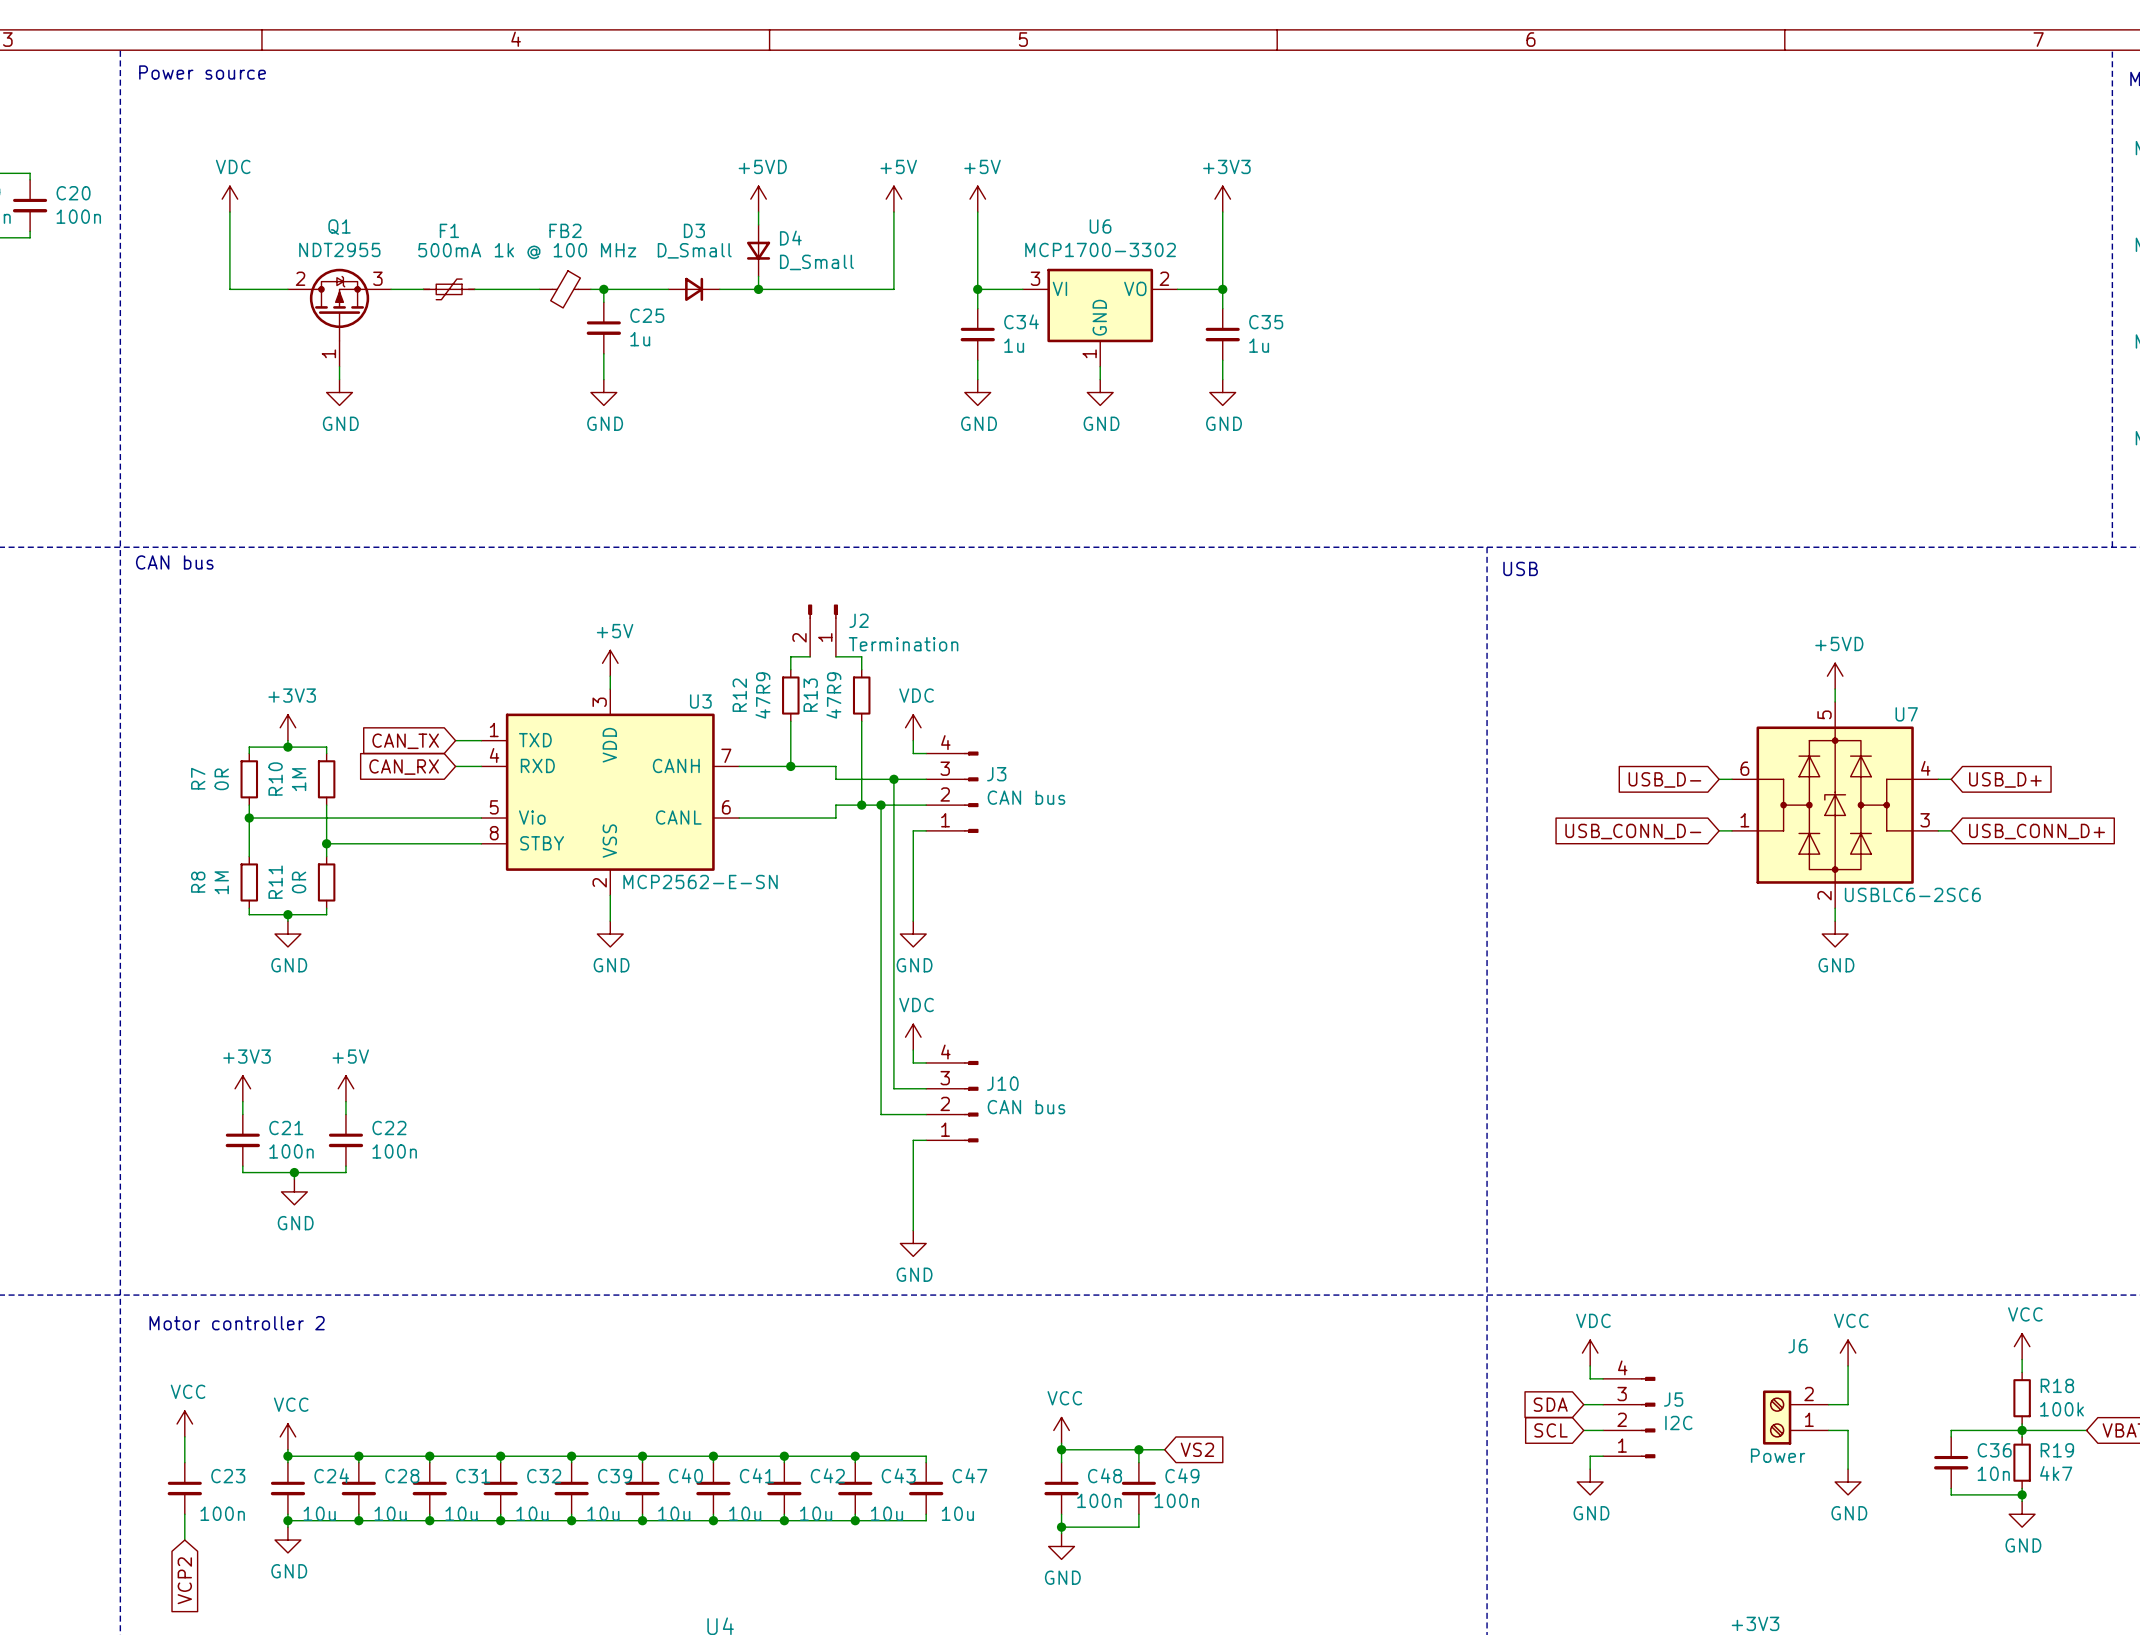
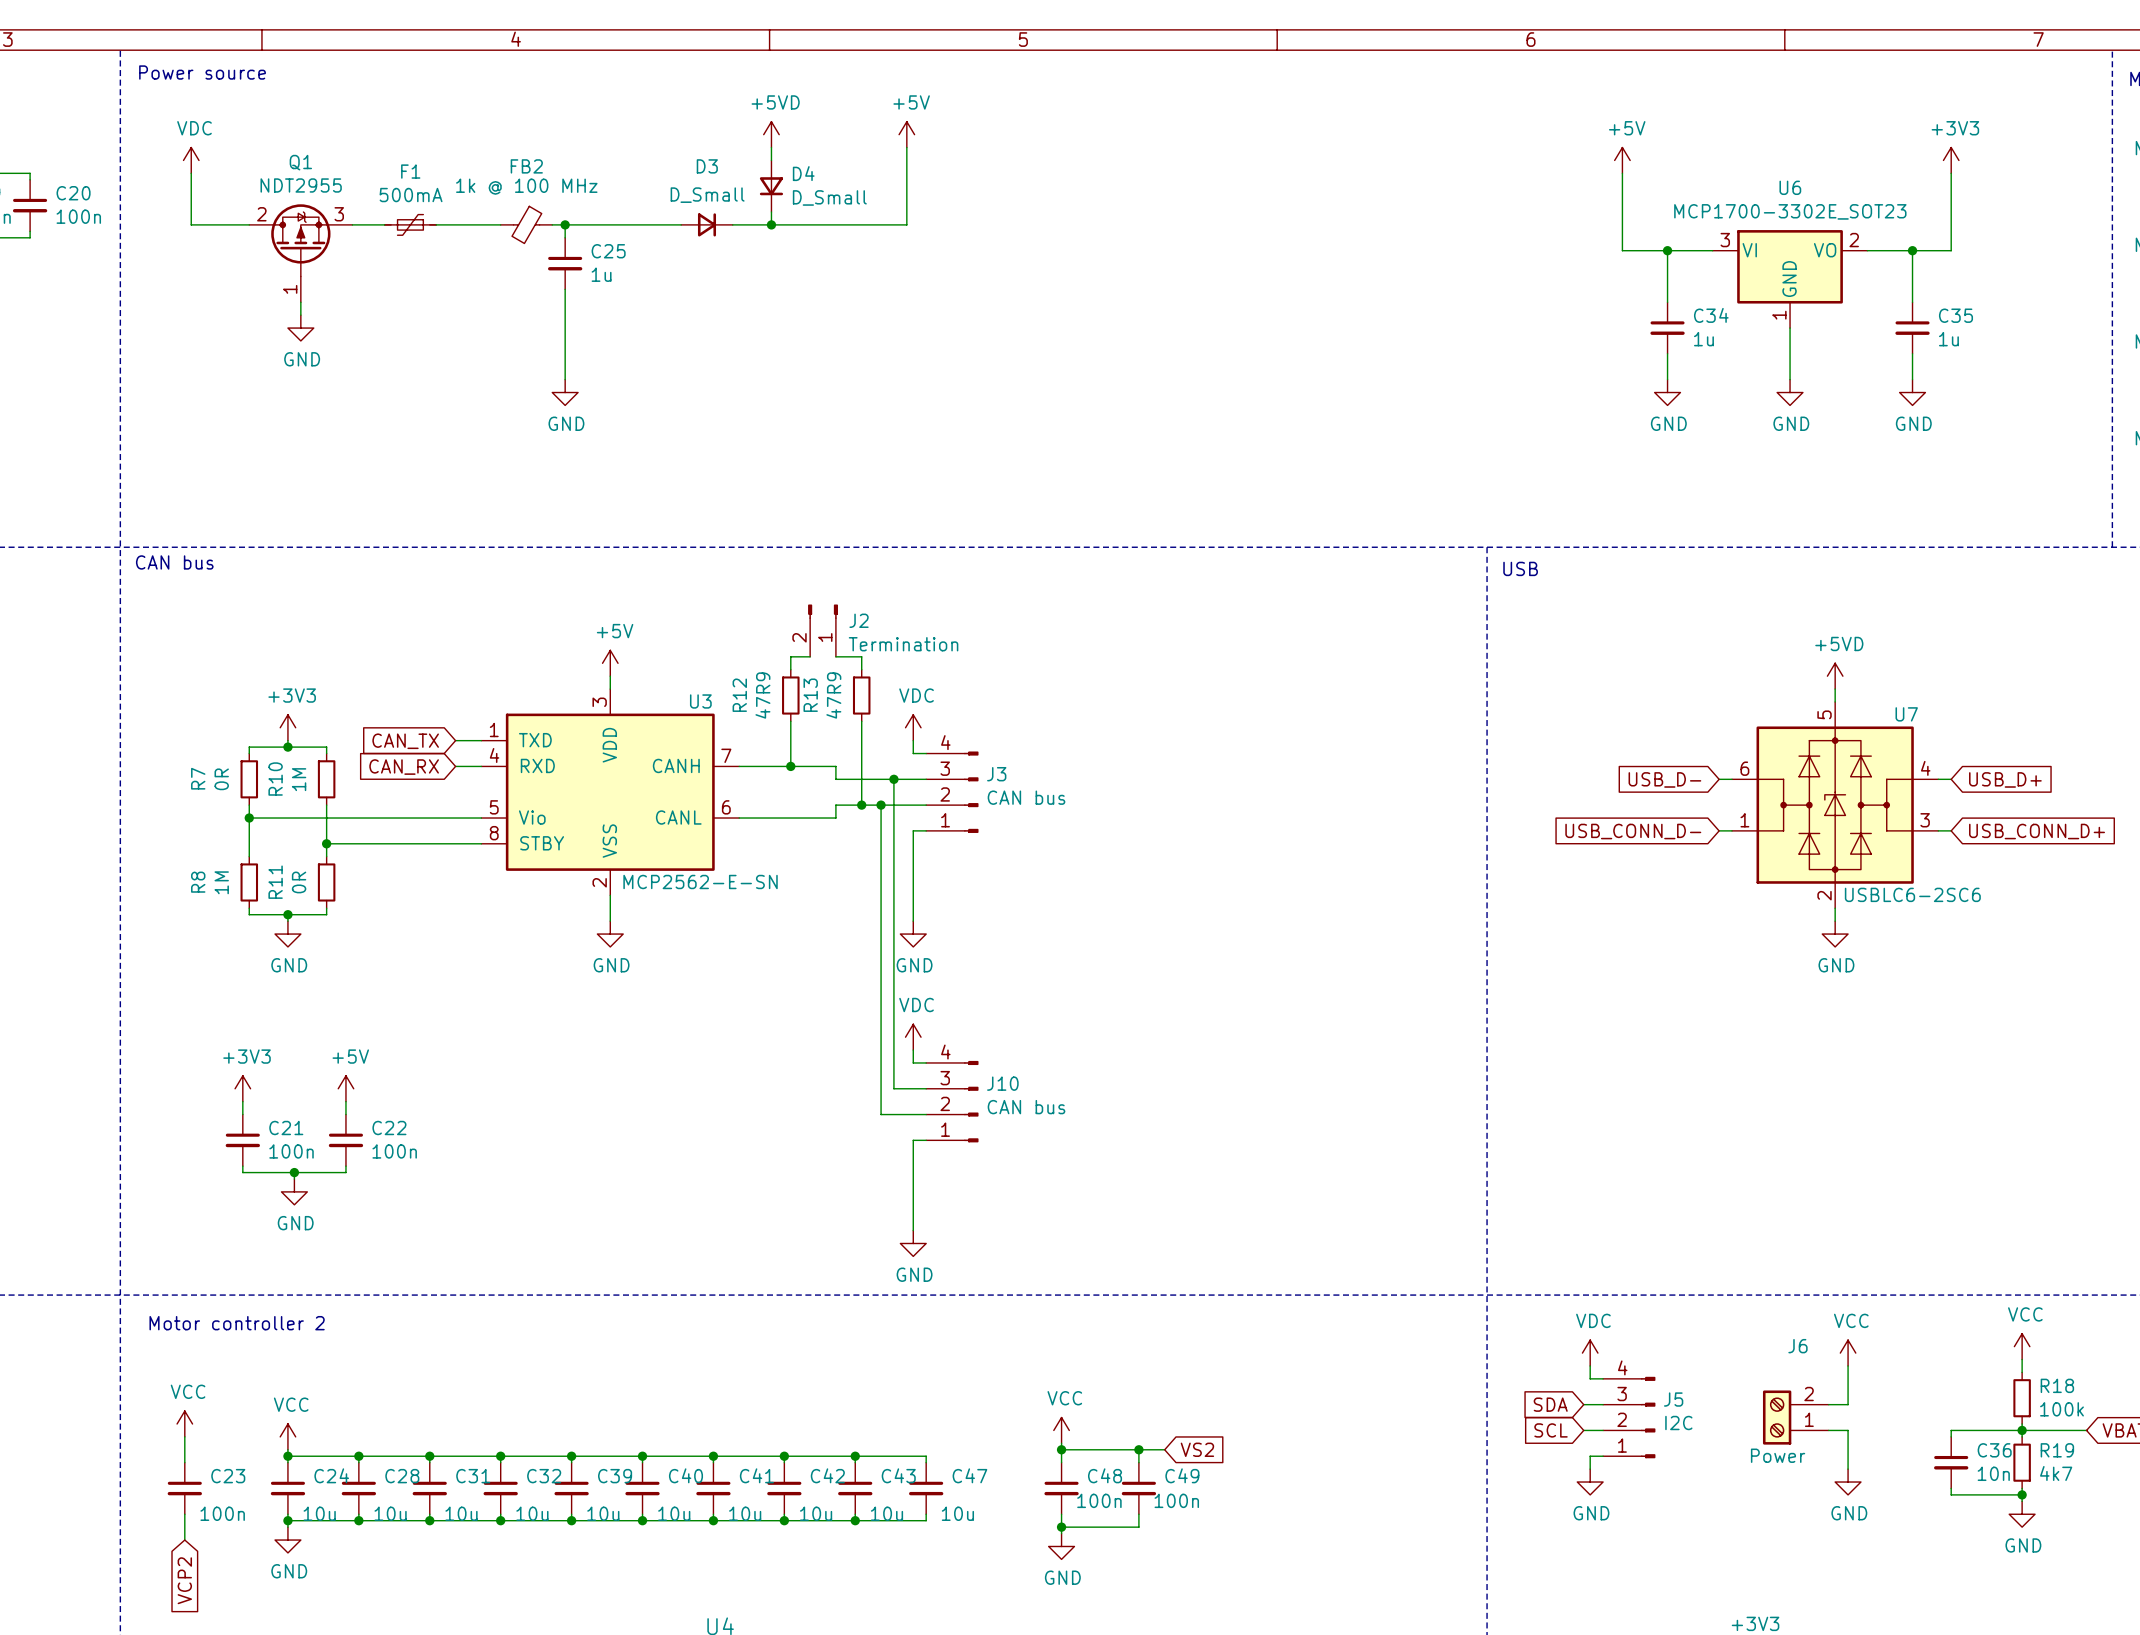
power symbol: none -> +5V (906, 134)
power symbol: none -> +5V (1622, 160)
power symbol: none -> +3V3 (1951, 160)
wire: none -> (191, 173) (191, 224) (249, 224)
wire: none -> (1622, 173) (1622, 250) (1712, 250)
wire: none -> (1951, 173) (1951, 250) (1867, 250)
power symbol position: VDC (229, 199) -> VDC (191, 160)
power symbol position: +5VD (758, 199) -> +5VD (771, 134)
power symbol: +5V (893, 199) -> none
power symbol: +5V (977, 199) -> none
power symbol: +3V3 (1222, 199) -> none
wire: (229, 212) (229, 289) (287, 289) -> none
wire: (758, 212) (758, 224) -> (771, 147) (771, 160)
wire: (893, 212) (893, 289) (719, 289) -> (906, 147) (906, 224) (732, 224)
wire: (977, 212) (977, 308) -> none
wire: (1222, 212) (1222, 308) -> none
wire: none -> (552, 224) (681, 224)
junction: none -> (565, 224)
junction: none -> (771, 224)
F1 name position: F1 (449, 230) -> F1 (410, 171)
U6 value: MCP1700-3302 (1100, 249) -> MCP1700-3302E_SOT23 (1790, 211)
F1 value position: 500mA (449, 250) -> 500mA (411, 195)
D3 value position: D_Small (694, 250) -> D_Small (707, 195)
D4 position: (758, 250) -> (771, 186)
wire: none -> (1667, 250) (1667, 302)
junction: none -> (1667, 250)
wire: none -> (1912, 250) (1912, 302)
junction: none -> (1912, 250)
wire: (758, 276) (758, 289) -> (771, 212) (771, 224)
wire: (391, 289) (423, 289) -> (352, 224) (384, 224)
F1 position: (449, 289) -> (410, 224)
wire: (474, 289) (539, 289) -> (436, 224) (500, 224)
wire: none -> (565, 289) (565, 379)
FB2 position: (565, 289) -> (526, 224)
wire: (590, 289) (668, 289) -> none
wire: (603, 289) (603, 302) -> (565, 224) (565, 237)
junction: (603, 289) -> none
D3 position: (694, 289) -> (706, 224)
junction: (758, 289) -> none
wire: (977, 289) (1022, 289) -> none
junction: (977, 289) -> none
wire: (1177, 289) (1222, 289) -> none
junction: (1222, 289) -> none
Q1 position: (339, 317) -> (300, 253)
U6 position: (1100, 317) -> (1790, 279)
C25 position: (603, 328) -> (565, 263)
wire: none -> (1790, 328) (1790, 379)
C34 position: (977, 334) -> (1667, 328)
C35 position: (1222, 334) -> (1912, 328)
wire: (603, 353) (603, 379) -> none
wire: none -> (1667, 353) (1667, 379)
wire: none -> (1912, 353) (1912, 379)
wire: (977, 360) (977, 379) -> none
wire: (1222, 360) (1222, 379) -> none
wire: (339, 366) (339, 379) -> (300, 302) (300, 315)
wire: (1100, 366) (1100, 379) -> none
power symbol position: GND (339, 392) -> GND (300, 328)
power symbol position: GND (603, 392) -> GND (565, 392)
power symbol: GND (977, 392) -> none
power symbol: GND (1100, 392) -> none
power symbol: GND (1222, 392) -> none
power symbol: none -> GND (1667, 392)
power symbol: none -> GND (1790, 392)
power symbol: none -> GND (1912, 392)

